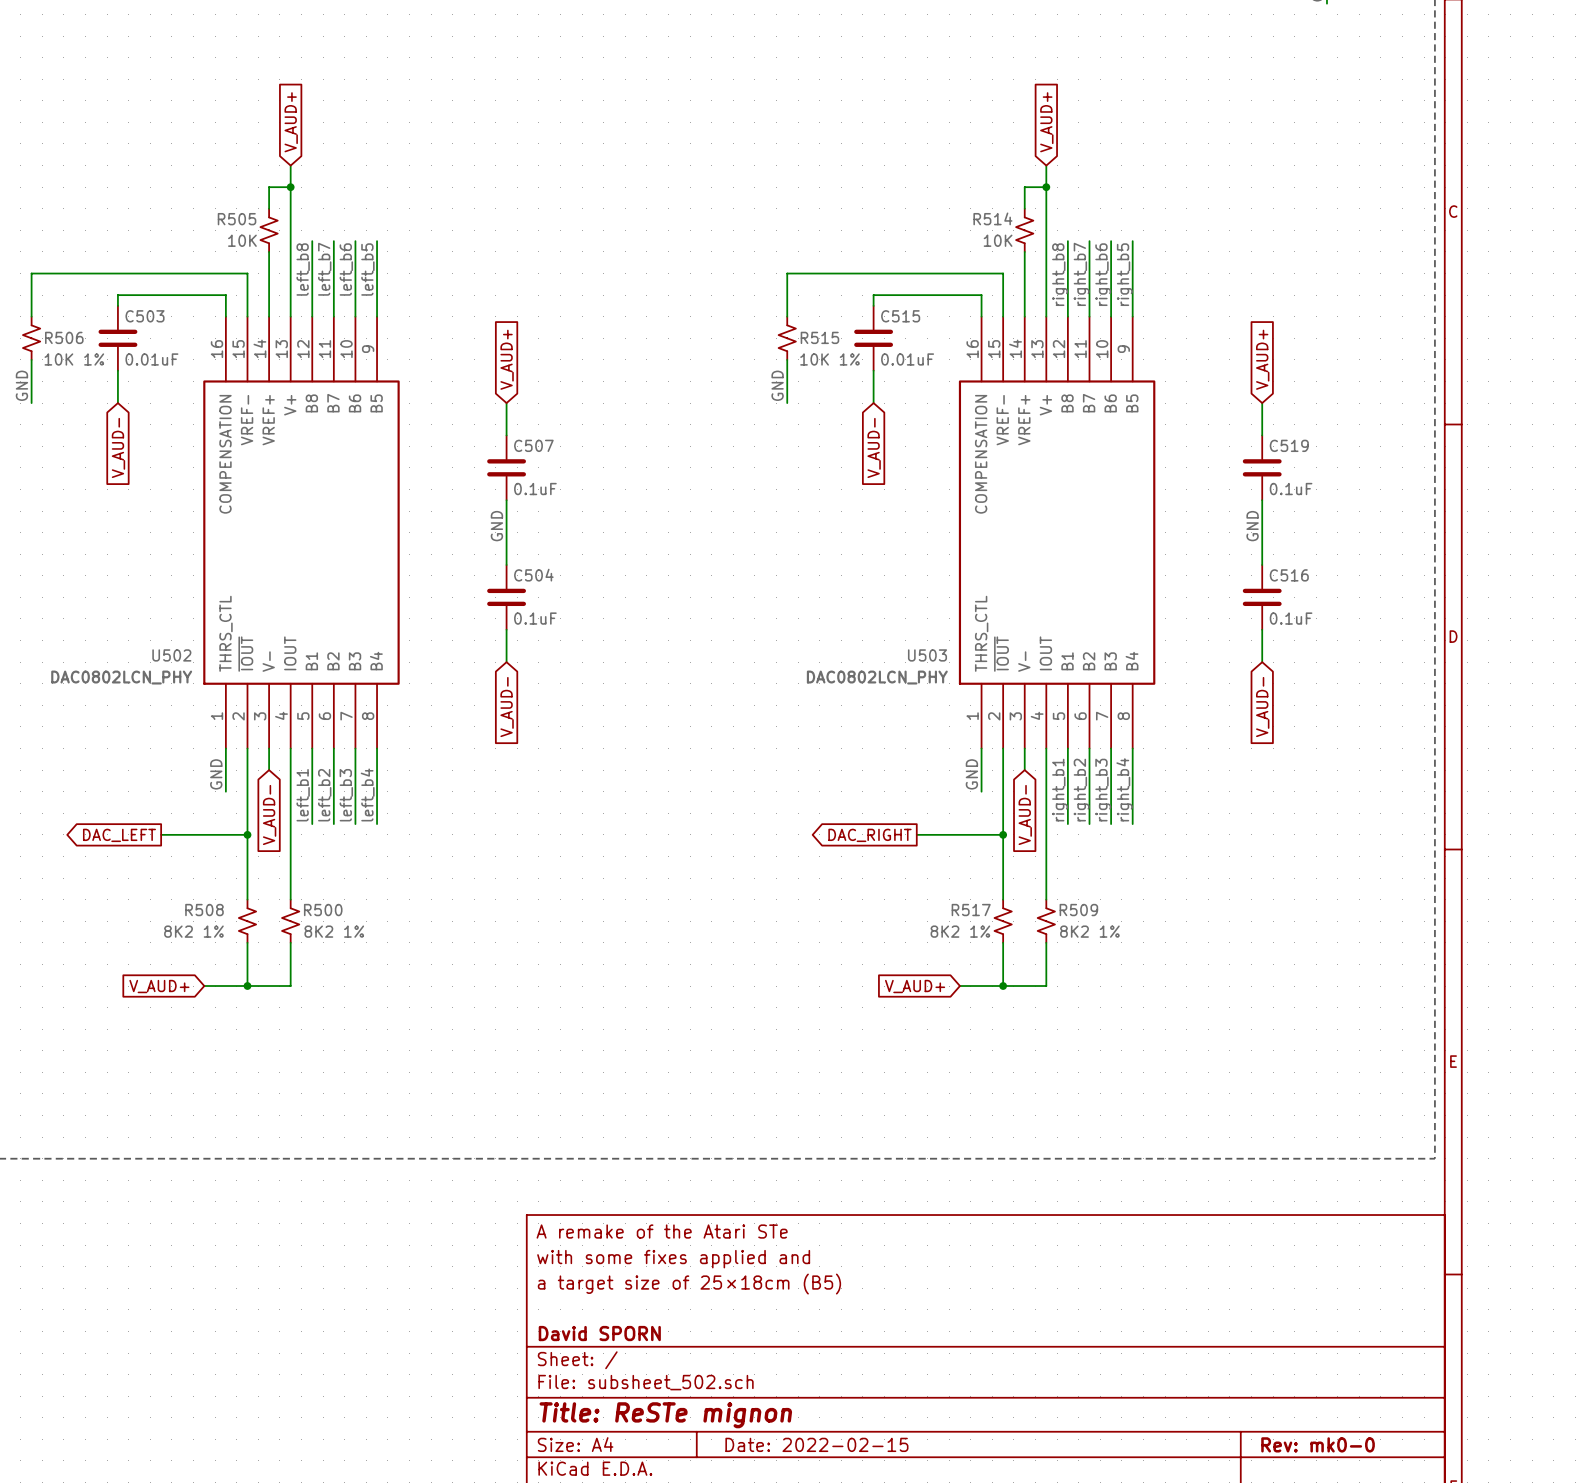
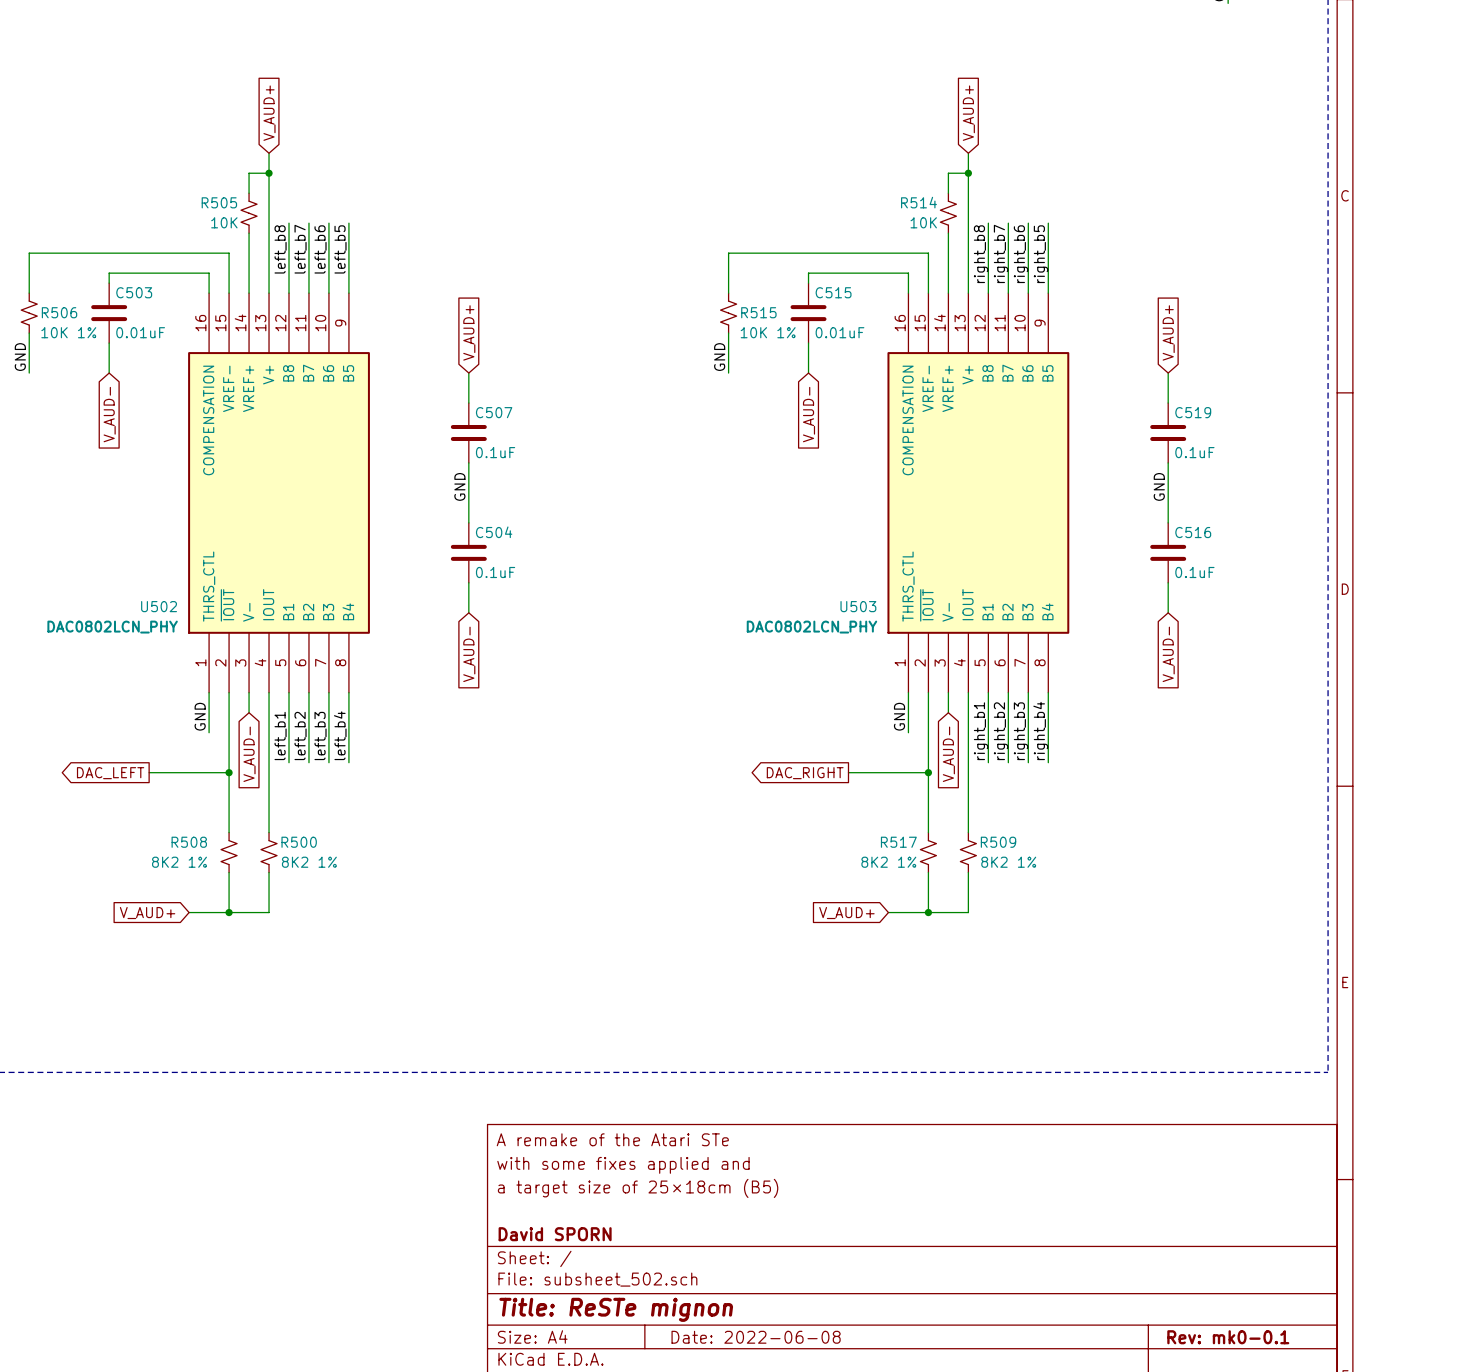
title block: Date: 2022-02-15 (816, 1444) -> Date: 2022-06-08 (756, 1337)
title block: Rev: mk0-0 (1318, 1444) -> Rev: mk0-0.1 (1228, 1337)

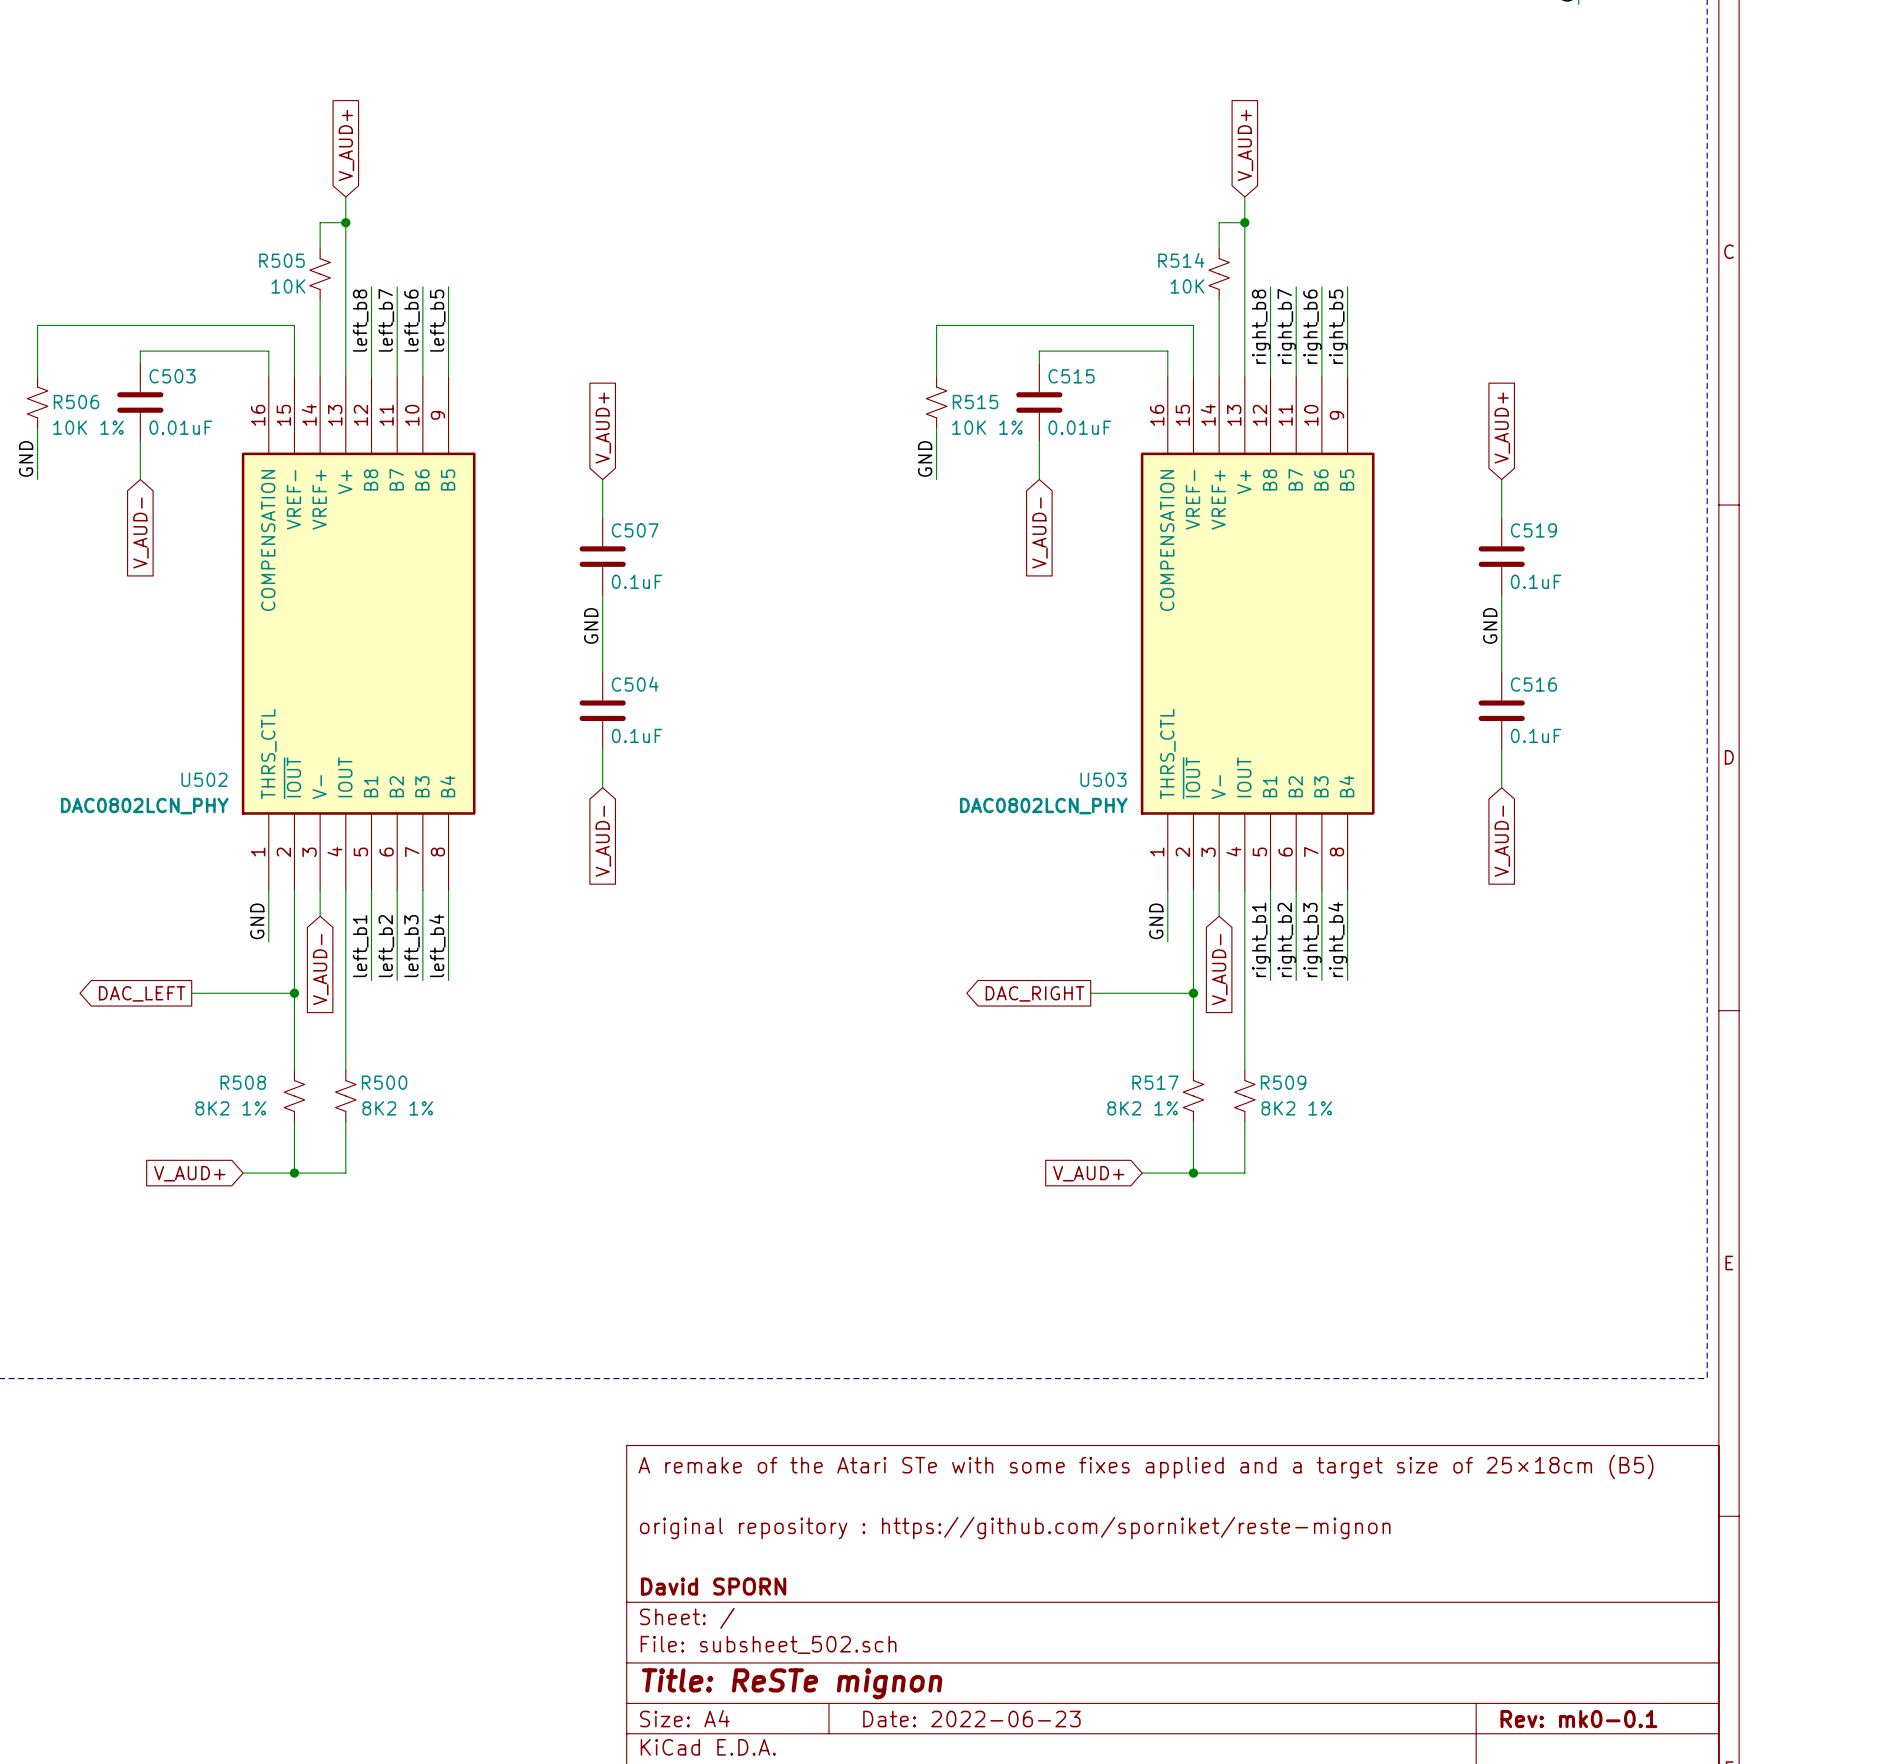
title block: A remake of the Atari STe (612, 1139) -> A remake of the Atari STe with some fixes applied and a target size of 25×18cm (B5) (1146, 1467)
title block: with some fixes applied and (623, 1165) -> none
title block: a target size of 25×18cm (B5) (638, 1188) -> original repository : https://github.com/sporniket/reste-mignon (1015, 1528)
title block: Date: 2022-06-08 (756, 1337) -> Date: 2022-06-23 (971, 1719)

